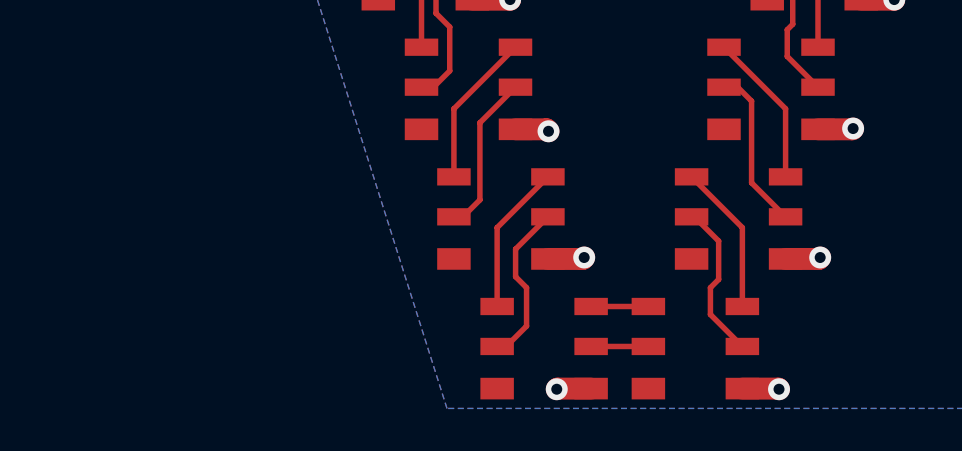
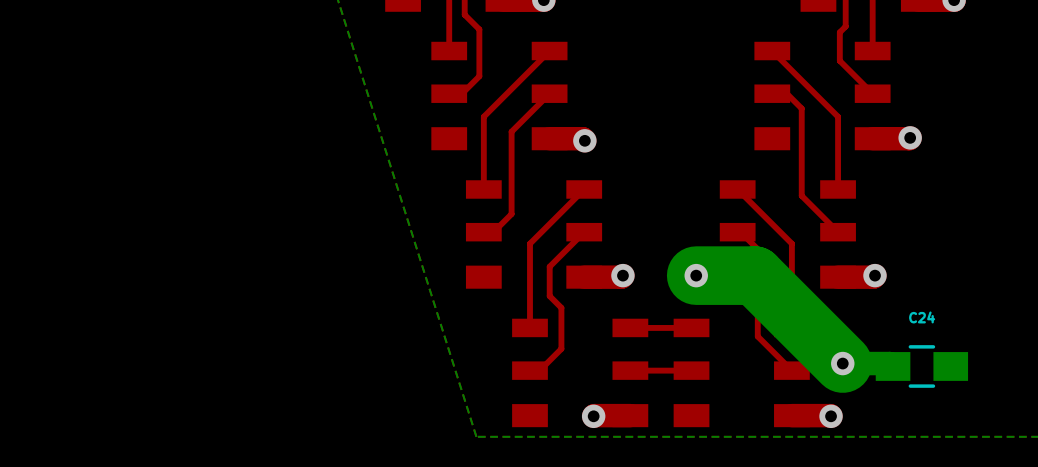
bottom track: none -> (696, 275) (754, 275) (842, 363) (890, 363) (893, 366)
via: none -> (696, 275)
via: none -> (842, 363)
C24: none -> (921, 366)

